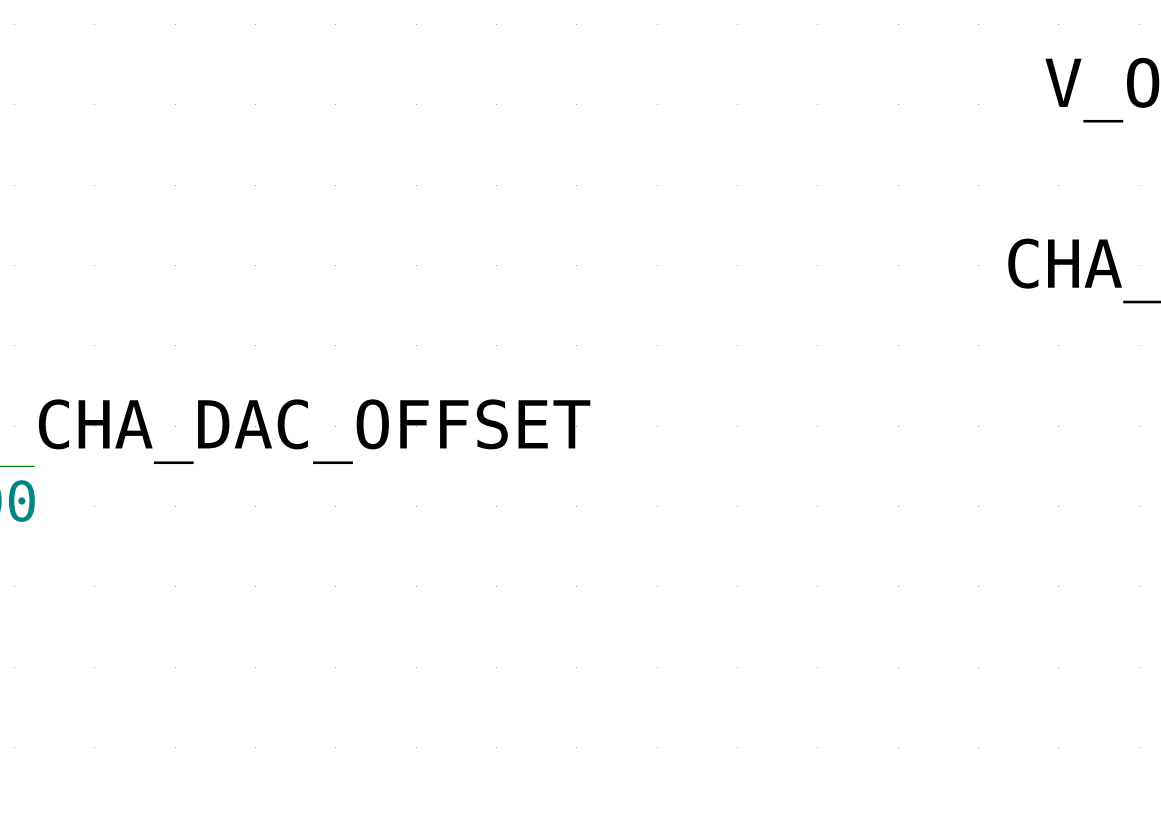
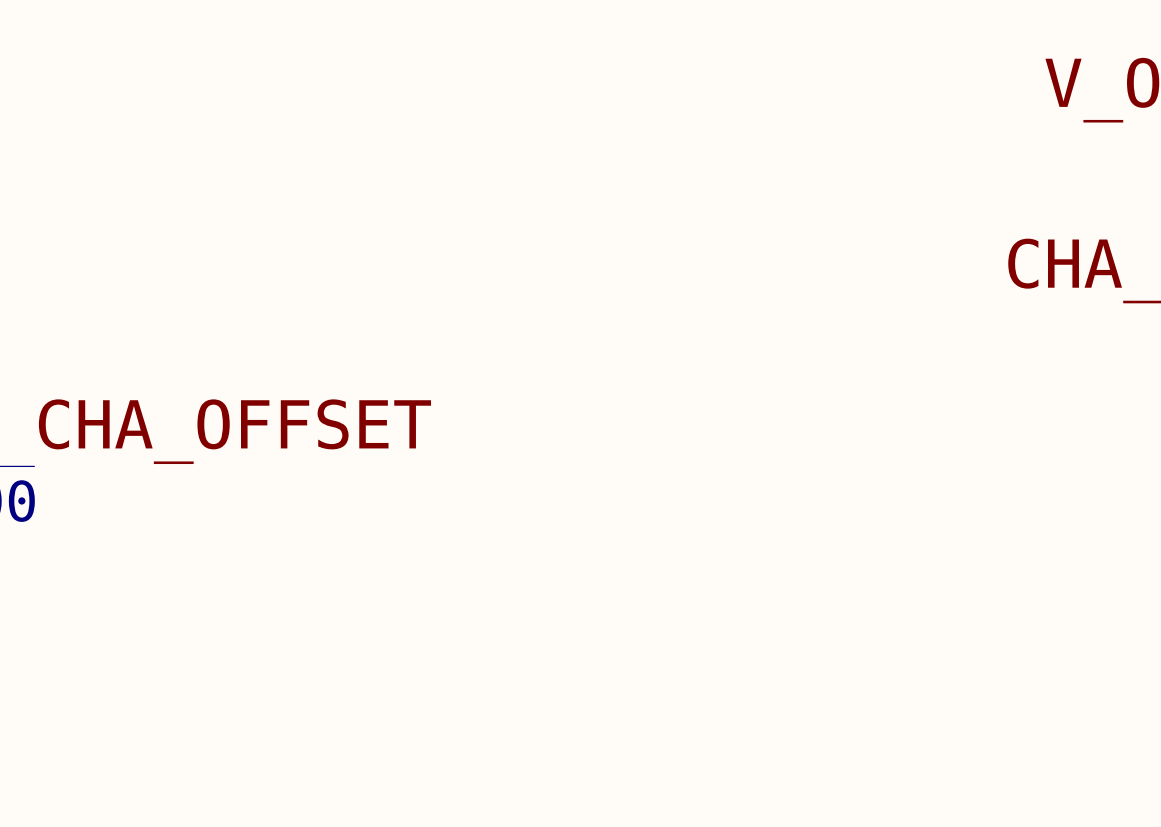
label: CHA_DAC_OFFSET (314, 431) -> CHA_OFFSET (234, 431)

